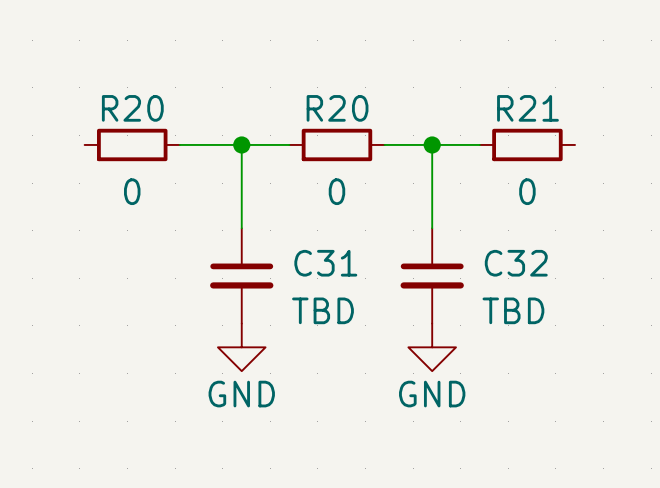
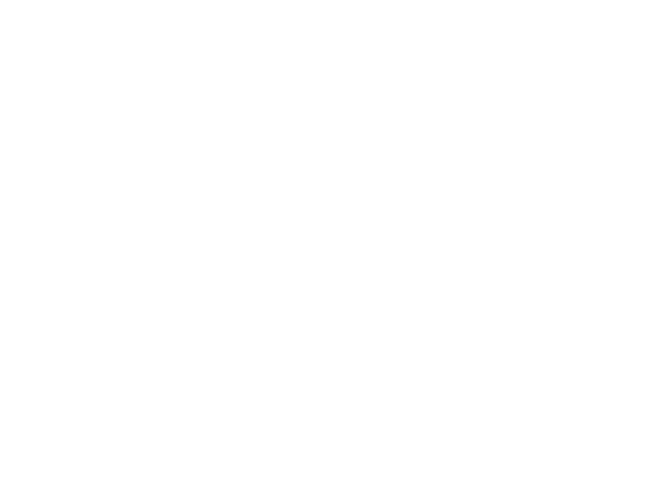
R20: 0 (132, 144) -> none
wire: (179, 144) (289, 144) -> none
wire: (241, 144) (241, 228) -> none
junction: (241, 144) -> none
R20: 0 (336, 144) -> none
wire: (384, 144) (479, 144) -> none
wire: (432, 144) (432, 228) -> none
junction: (432, 144) -> none
R21: 0 (527, 144) -> none
C31: TBD (241, 275) -> none
C32: TBD (432, 275) -> none
power symbol: GND (241, 347) -> none
power symbol: GND (432, 347) -> none

